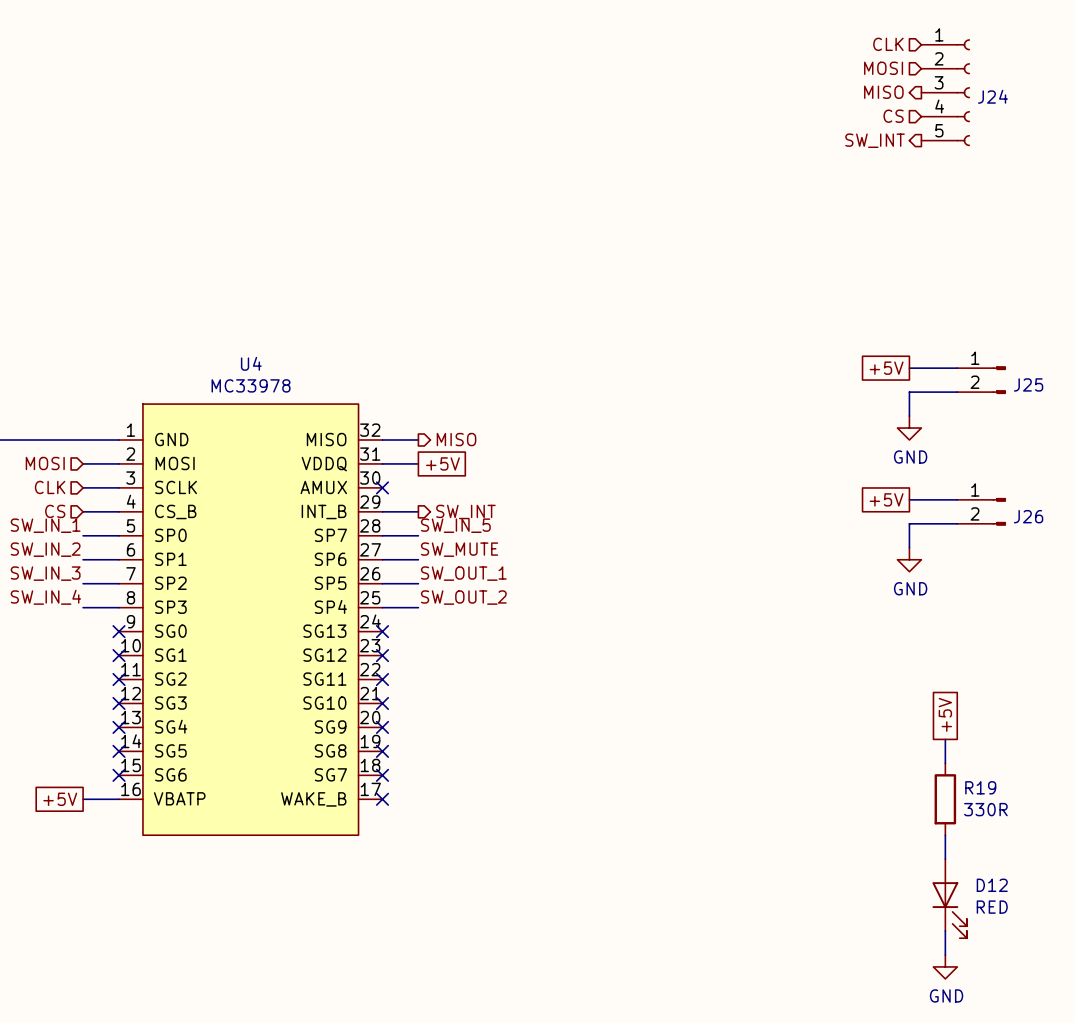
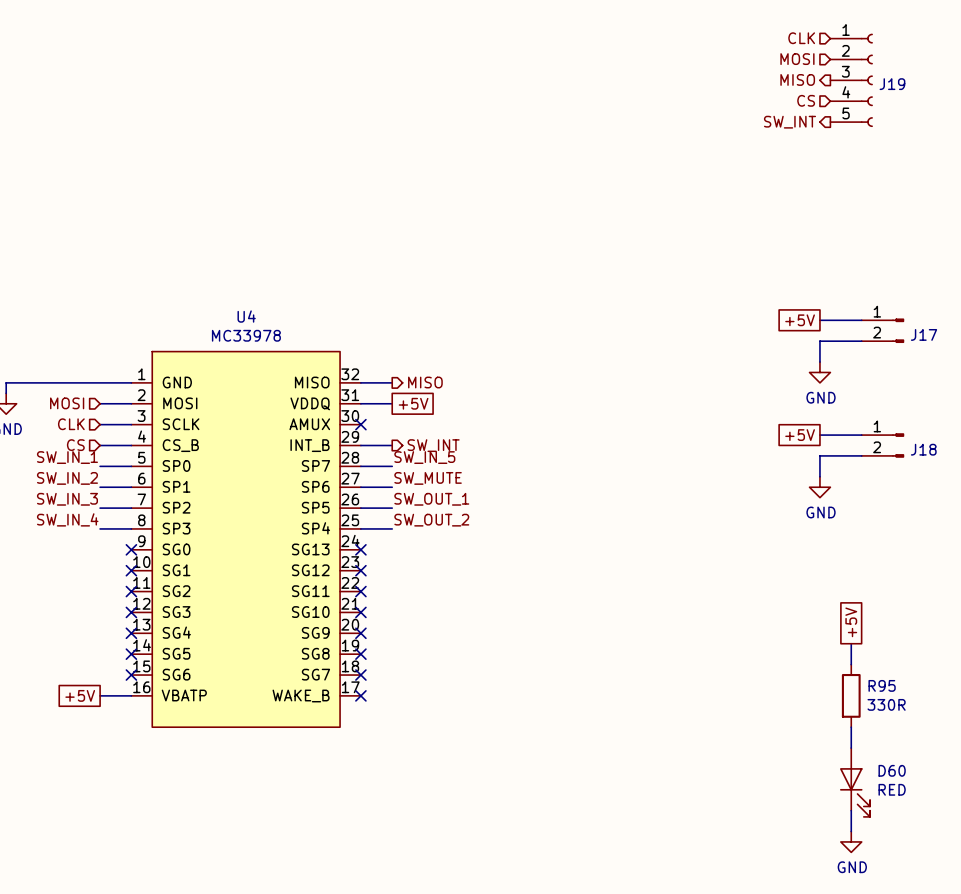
J24 name: J24 (992, 96) -> J19 (892, 84)
J25 name: J25 (1028, 384) -> J17 (924, 334)
J26 name: J26 (1028, 516) -> J18 (923, 449)
R19 name: R19 (980, 787) -> R95 (882, 685)
D12 name: D12 (992, 885) -> D60 (892, 770)

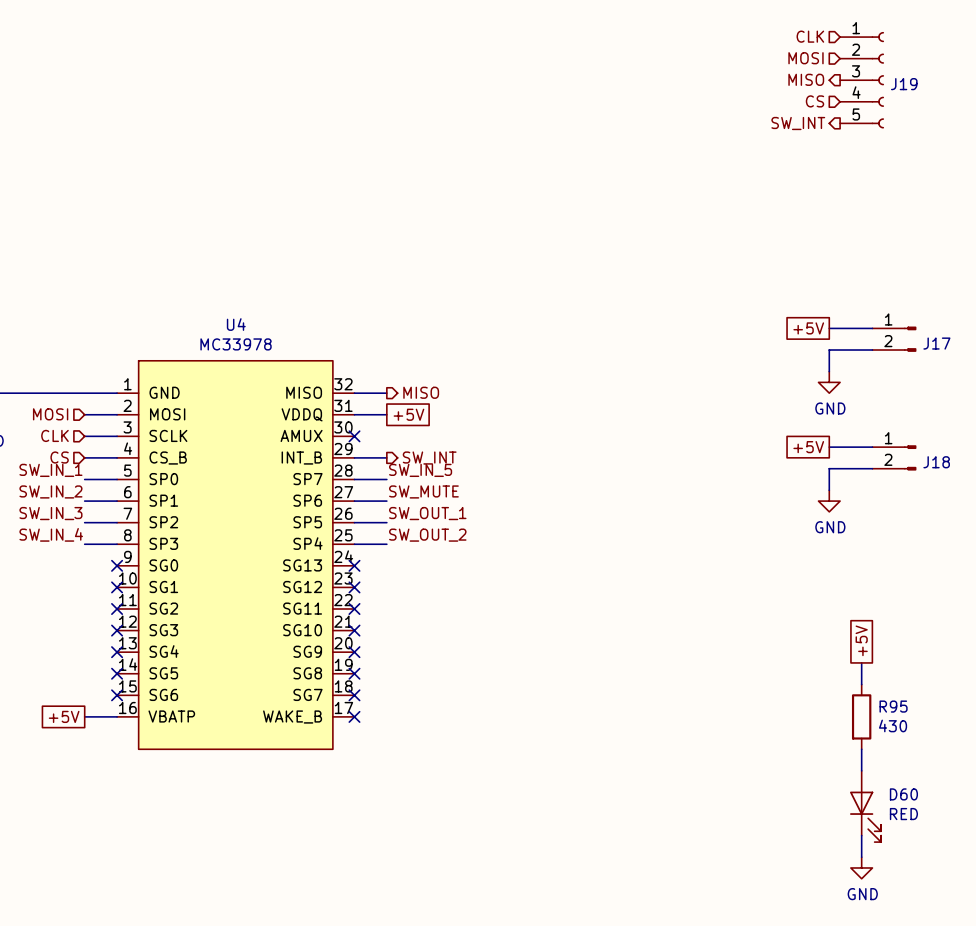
R95 value: 330R (886, 704) -> 430 (893, 725)

